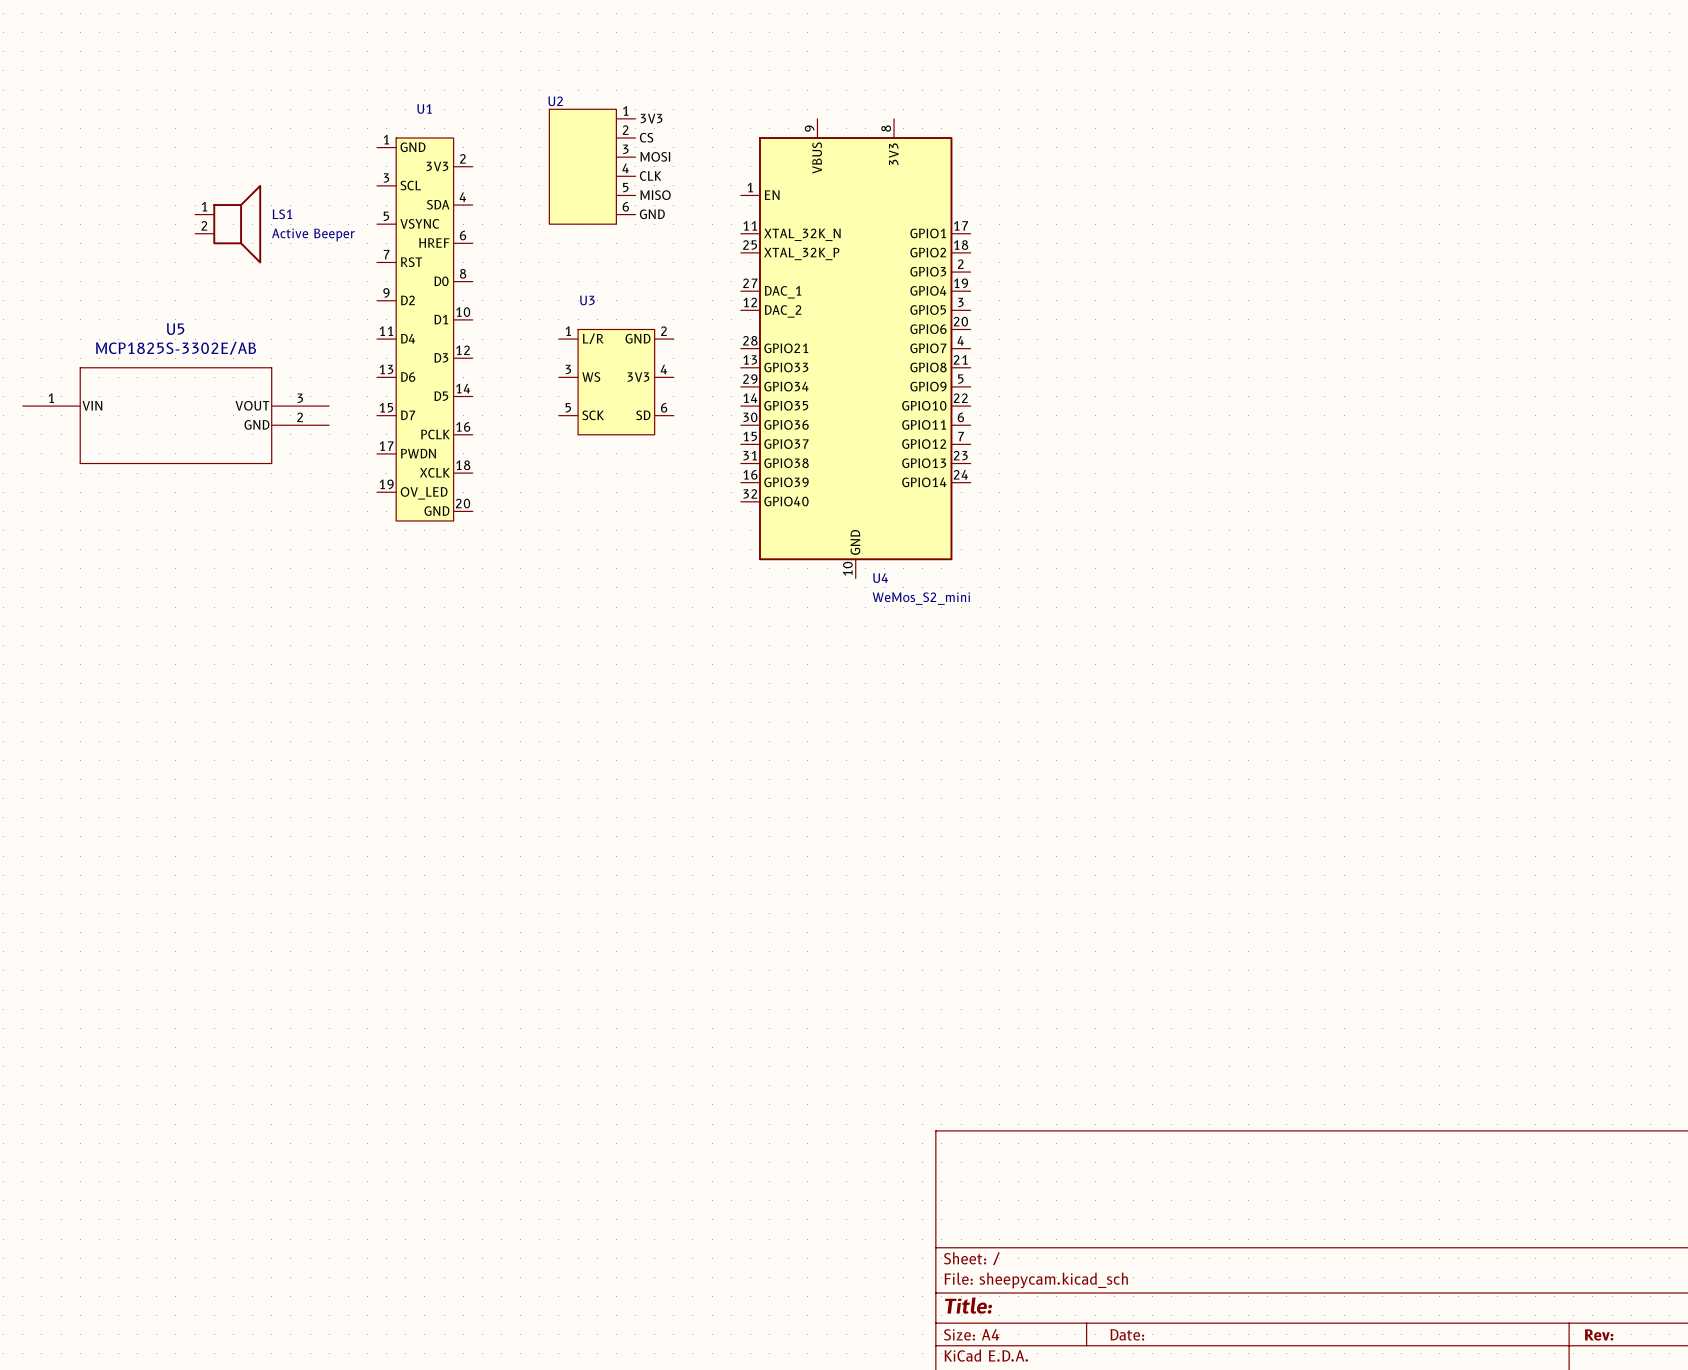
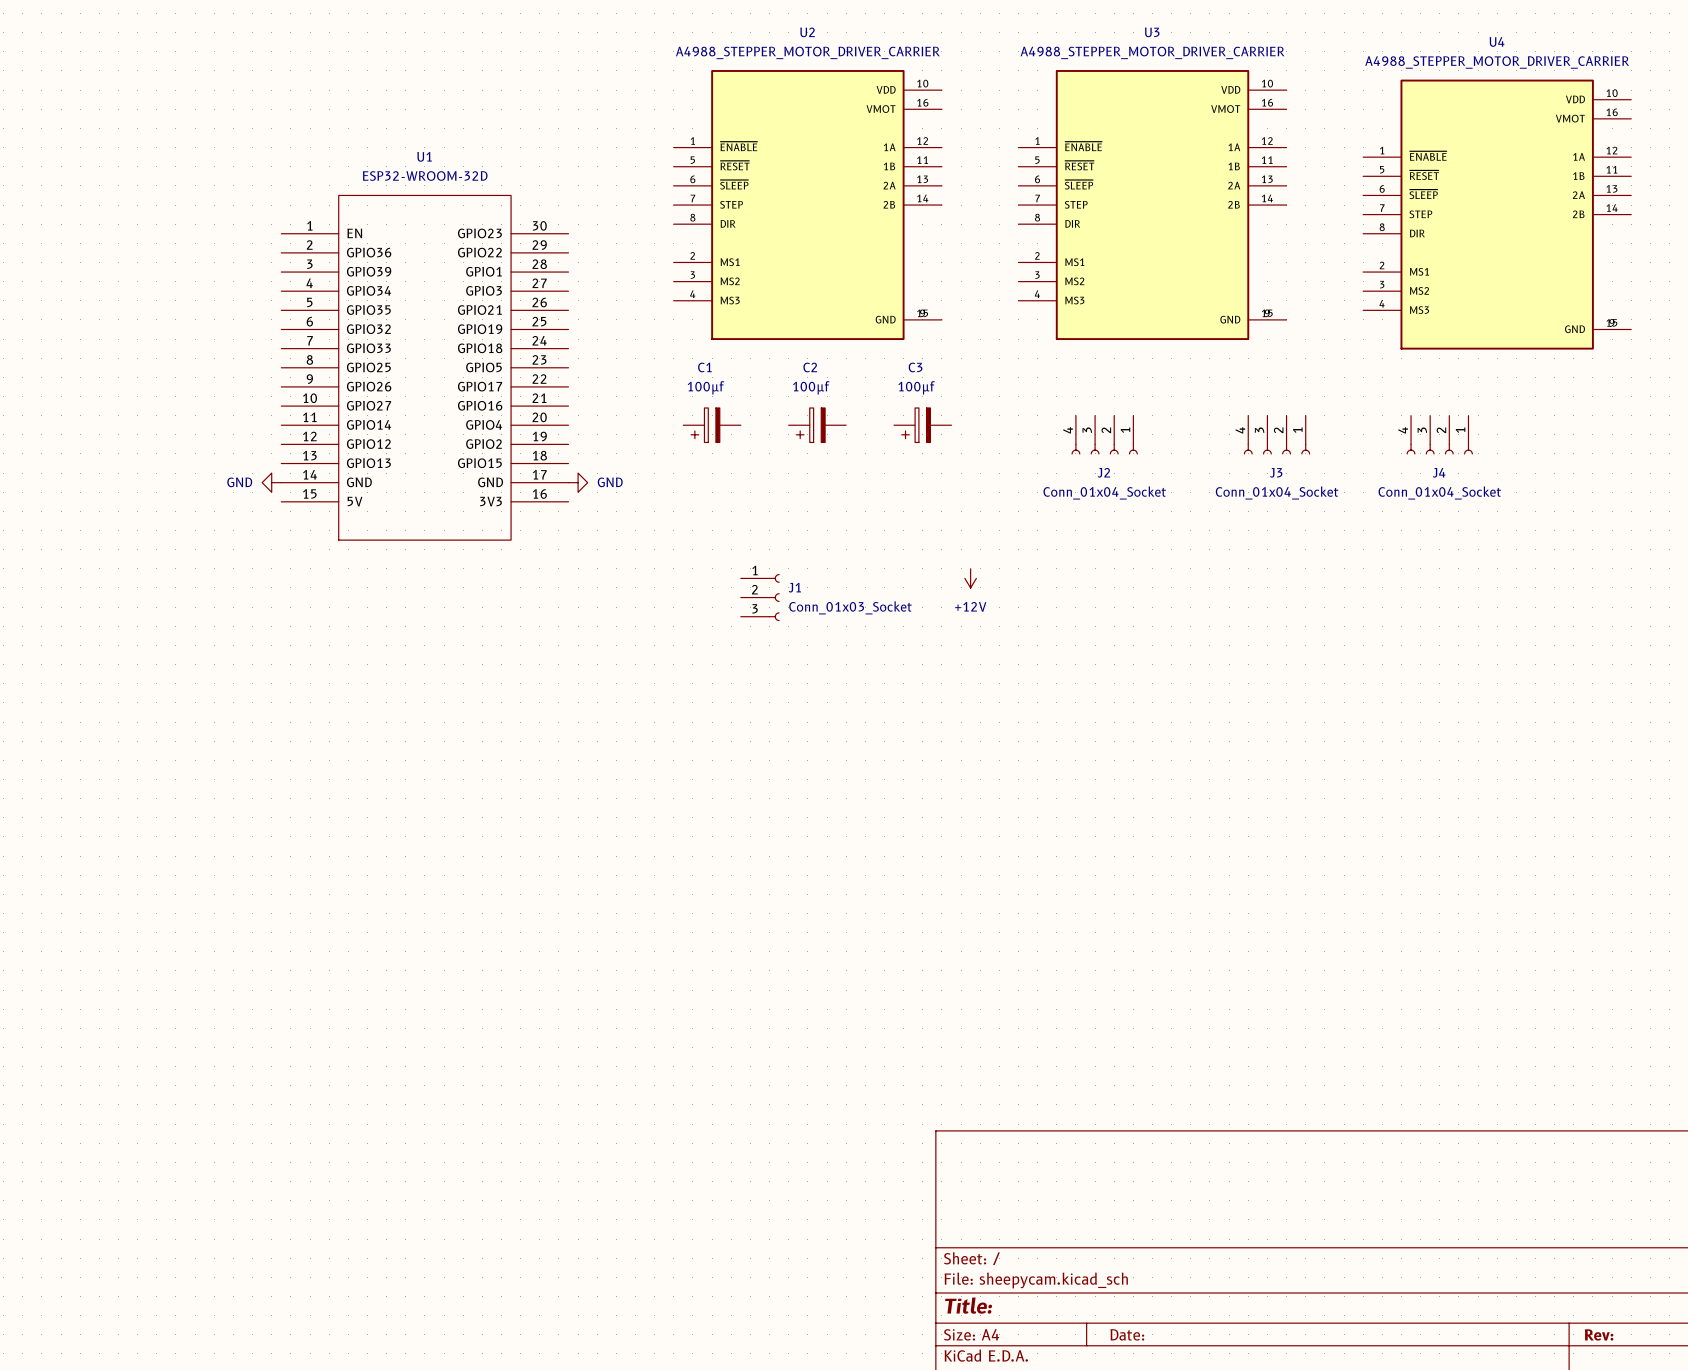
U2 value: none -> A4988_STEPPER_MOTOR_DRIVER_CARRIER (807, 52)
U3 value: none -> A4988_STEPPER_MOTOR_DRIVER_CARRIER (1152, 52)
U2 name position: U2 (555, 101) -> U2 (807, 32)
U2 symbol: [549, 109, 636, 225] -> [673, 70, 942, 341]
U4 symbol: [740, 118, 971, 579] -> [1363, 79, 1632, 350]
U1 symbol: [377, 138, 473, 521] -> [281, 195, 569, 541]
U1 value: none -> ESP32-WROOM-32D (425, 175)
LS1: Active Beeper (228, 224) -> none
U3 name position: U3 (587, 300) -> U3 (1152, 32)
U3 symbol: [558, 329, 674, 435] -> [1018, 70, 1287, 341]
U5: MCP1825S-3302E/AB (175, 415) -> none
C1: none -> 100µf (712, 425)
C2: none -> 100µf (817, 425)
C3: none -> 100µf (922, 425)
J2: none -> Conn_01x04_Socket (1104, 435)
J3: none -> Conn_01x04_Socket (1276, 435)
J4: none -> Conn_01x04_Socket (1439, 435)
power symbol: none -> GND (271, 482)
power symbol: none -> GND (578, 482)
U4 name position: U4 (880, 578) -> U4 (1497, 41)
power symbol: none -> +12V (970, 578)
J1: none -> Conn_01x03_Socket (760, 597)
U4 value: WeMos_S2_mini (921, 598) -> A4988_STEPPER_MOTOR_DRIVER_CARRIER (1497, 62)

